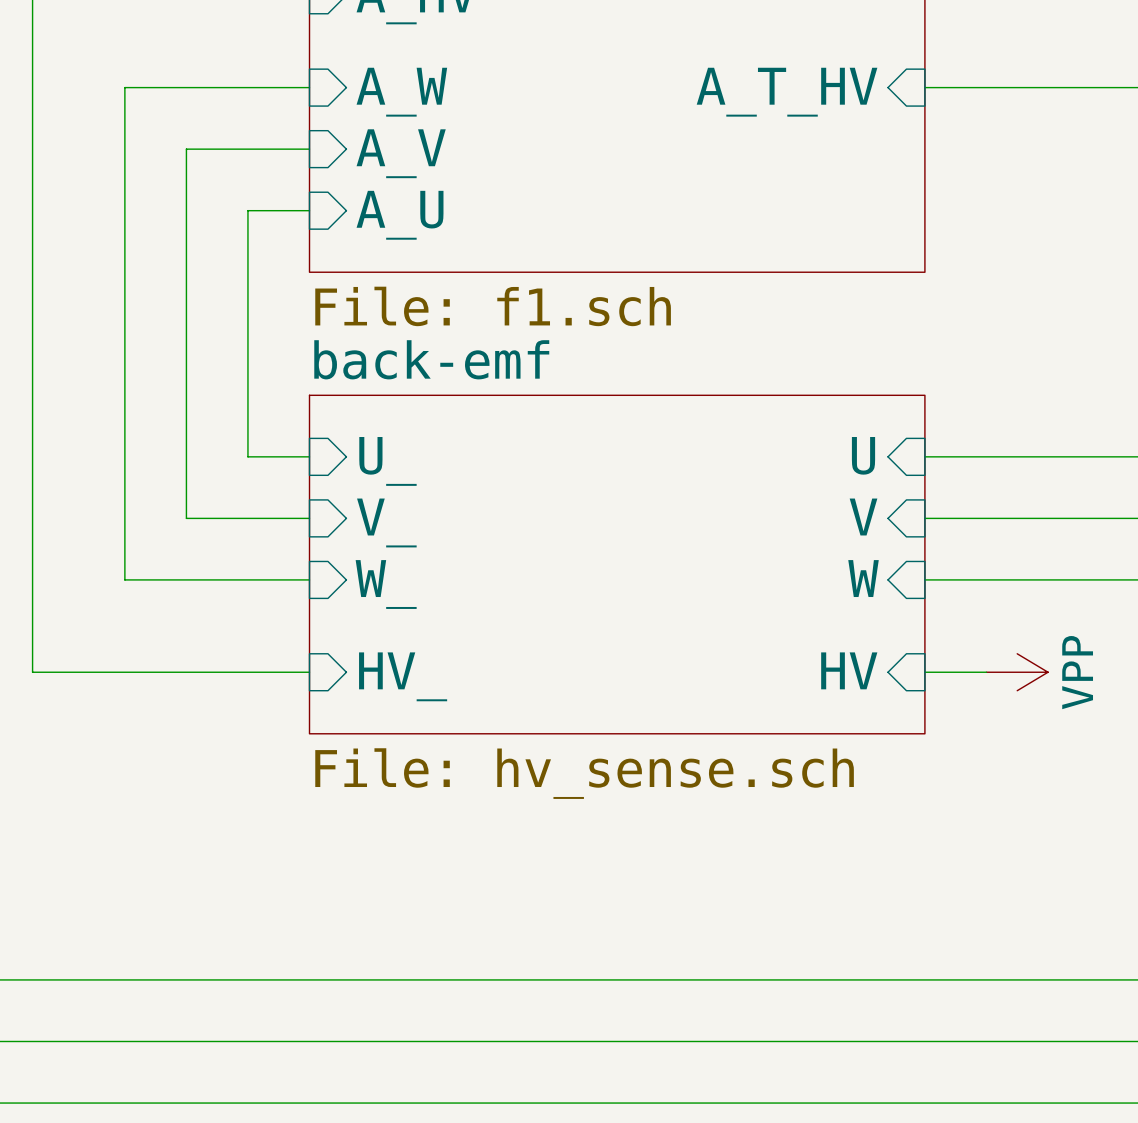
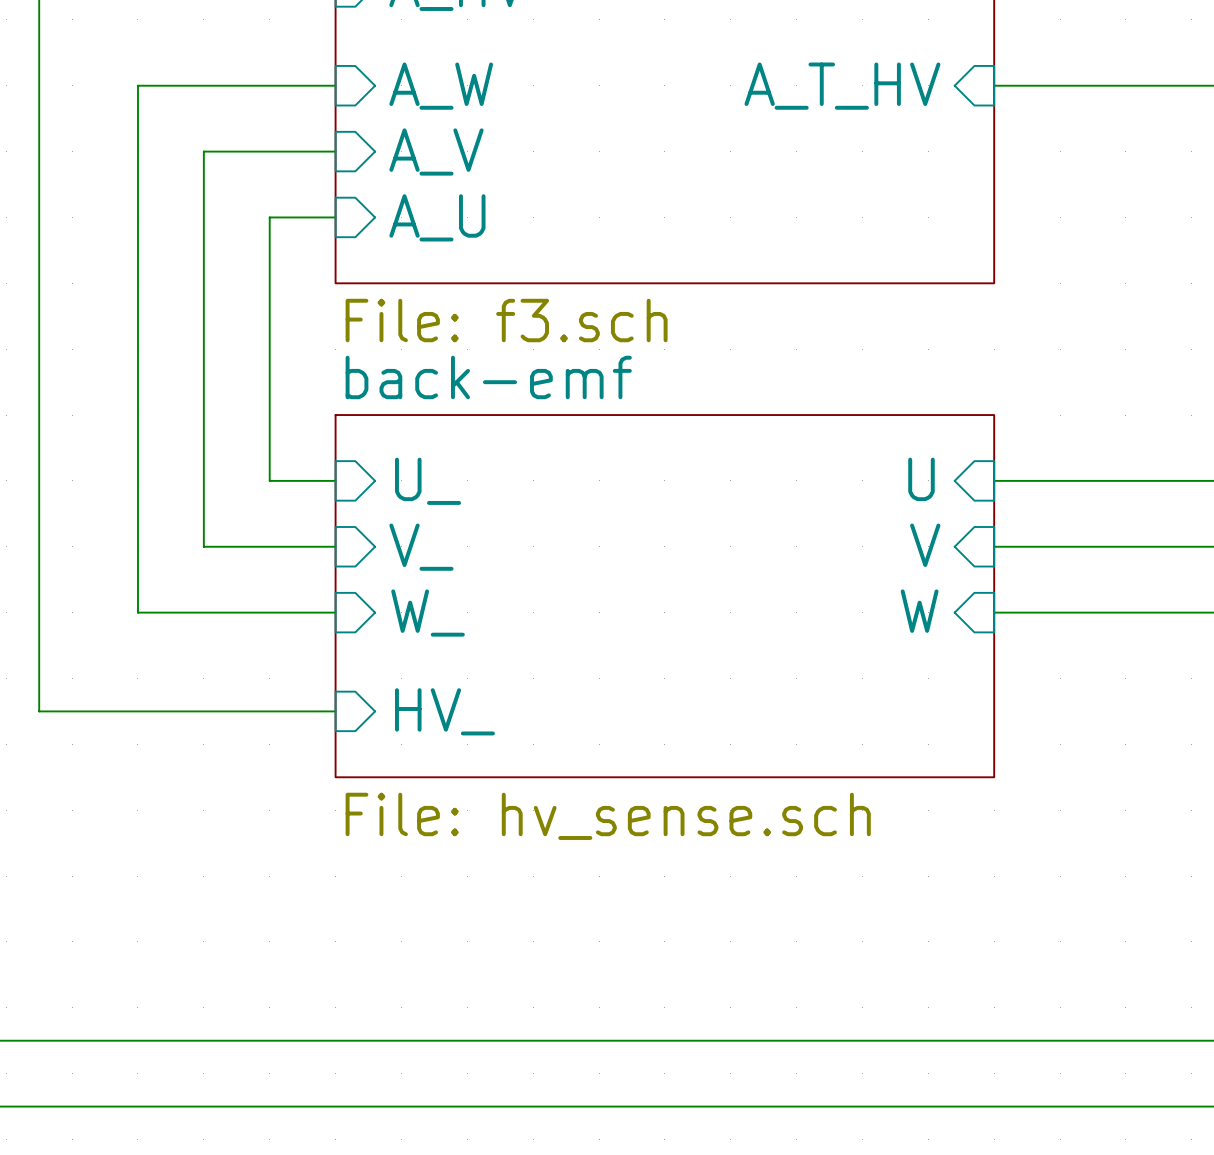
sheet value: File: f1.sch (493, 306) -> File: f3.sch (506, 320)
sheet pin: HV (849, 670) -> none
wire: (924, 672) (986, 672) -> none
power symbol: VPP (1017, 672) -> none

